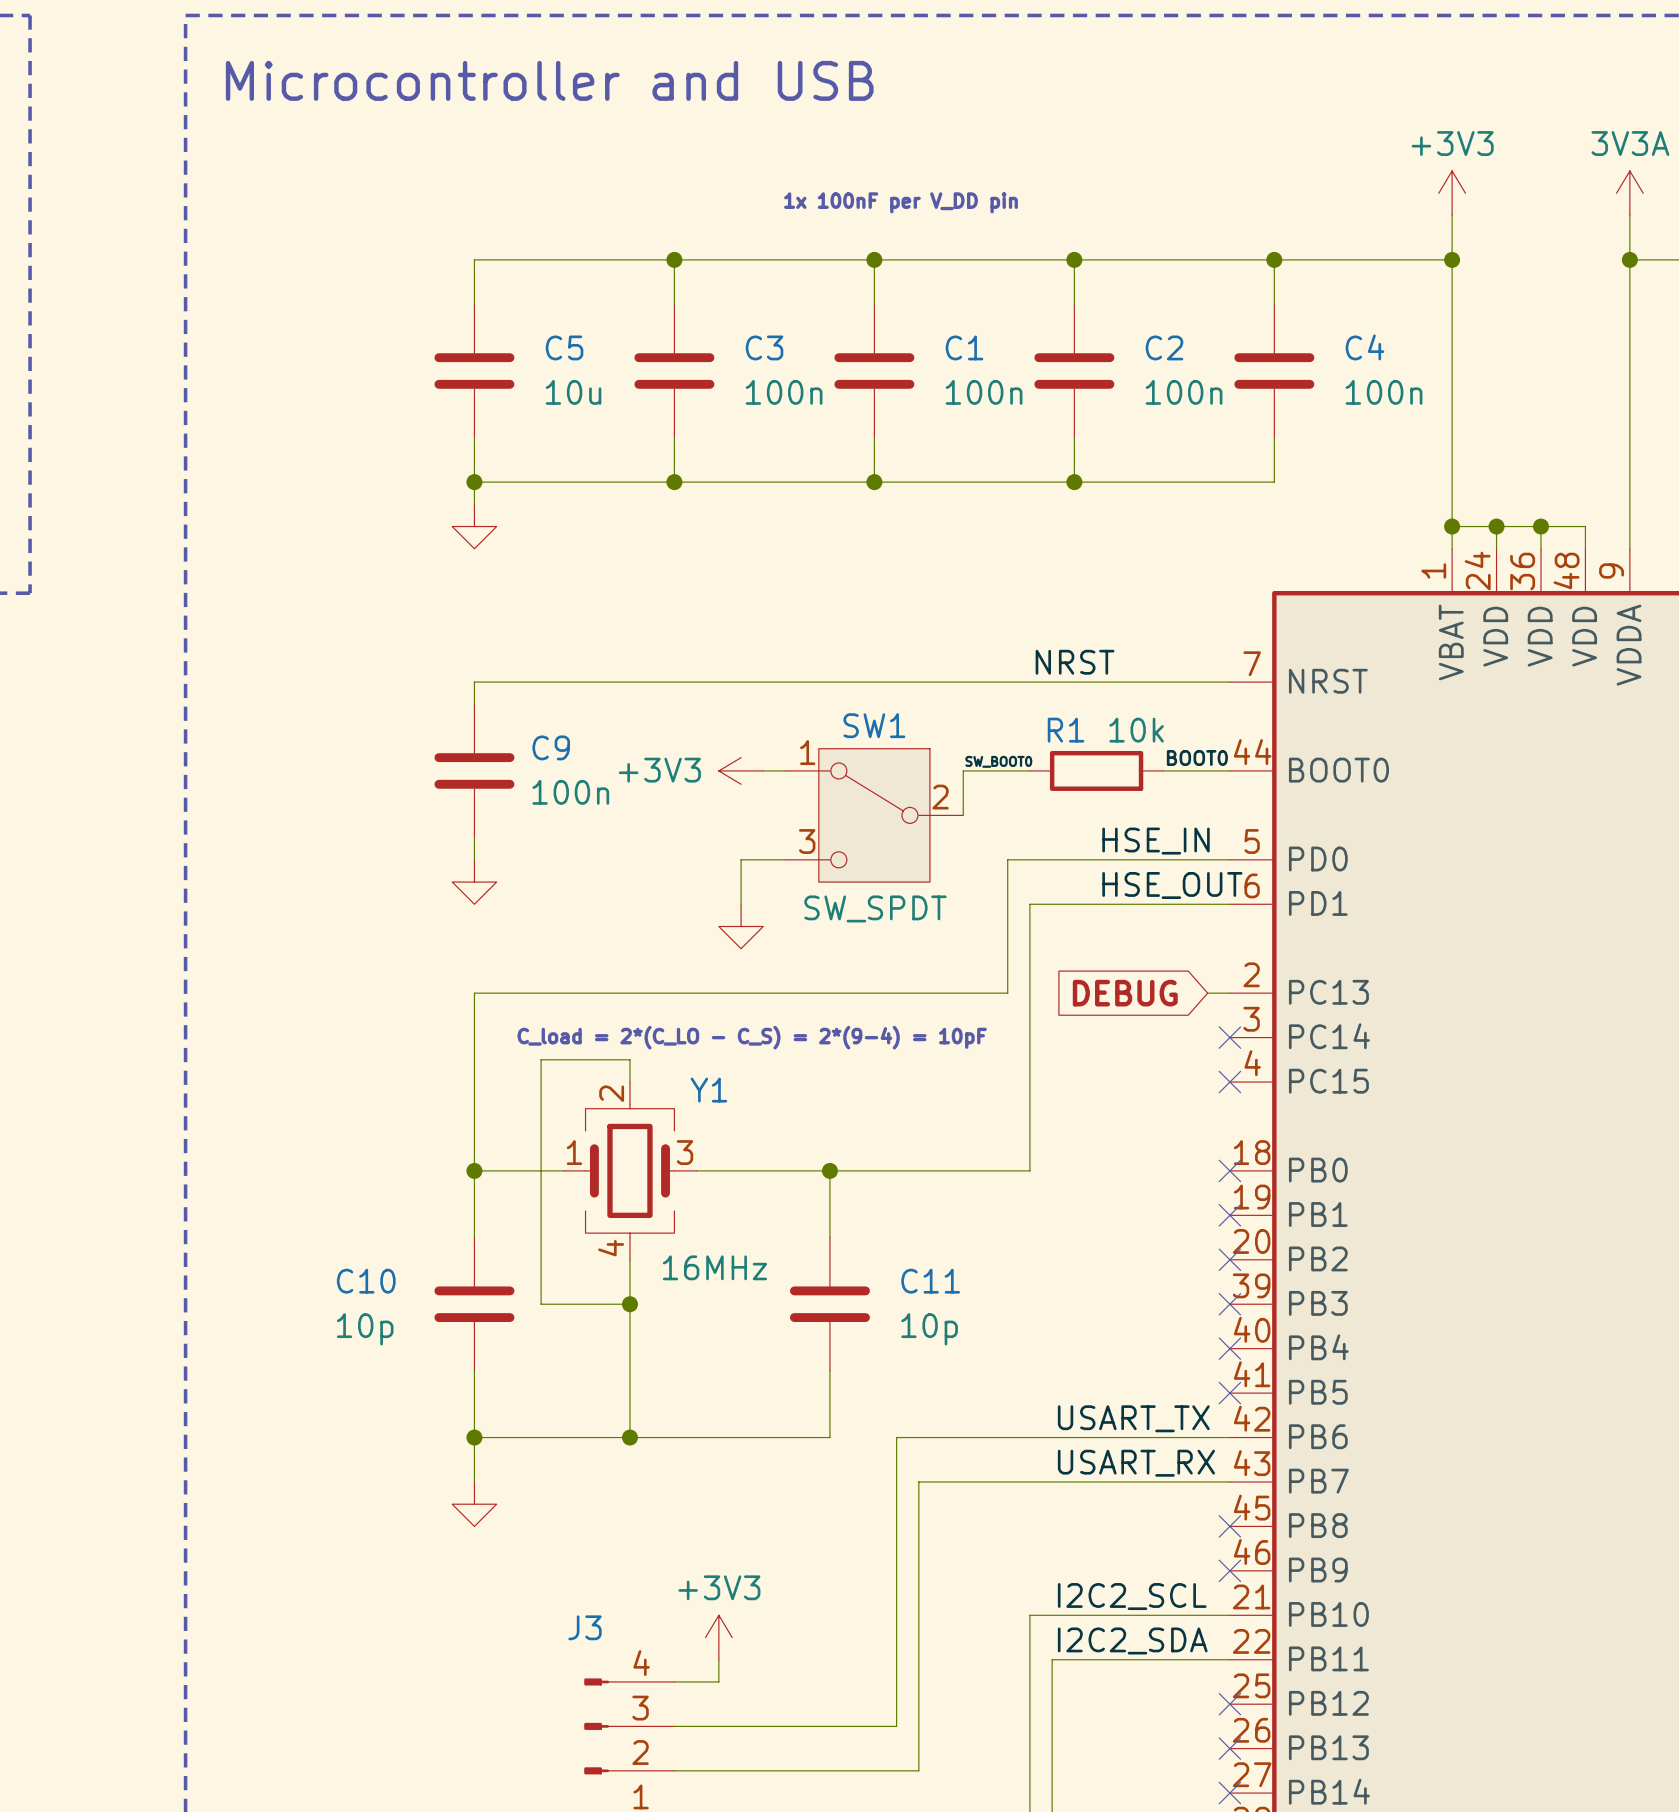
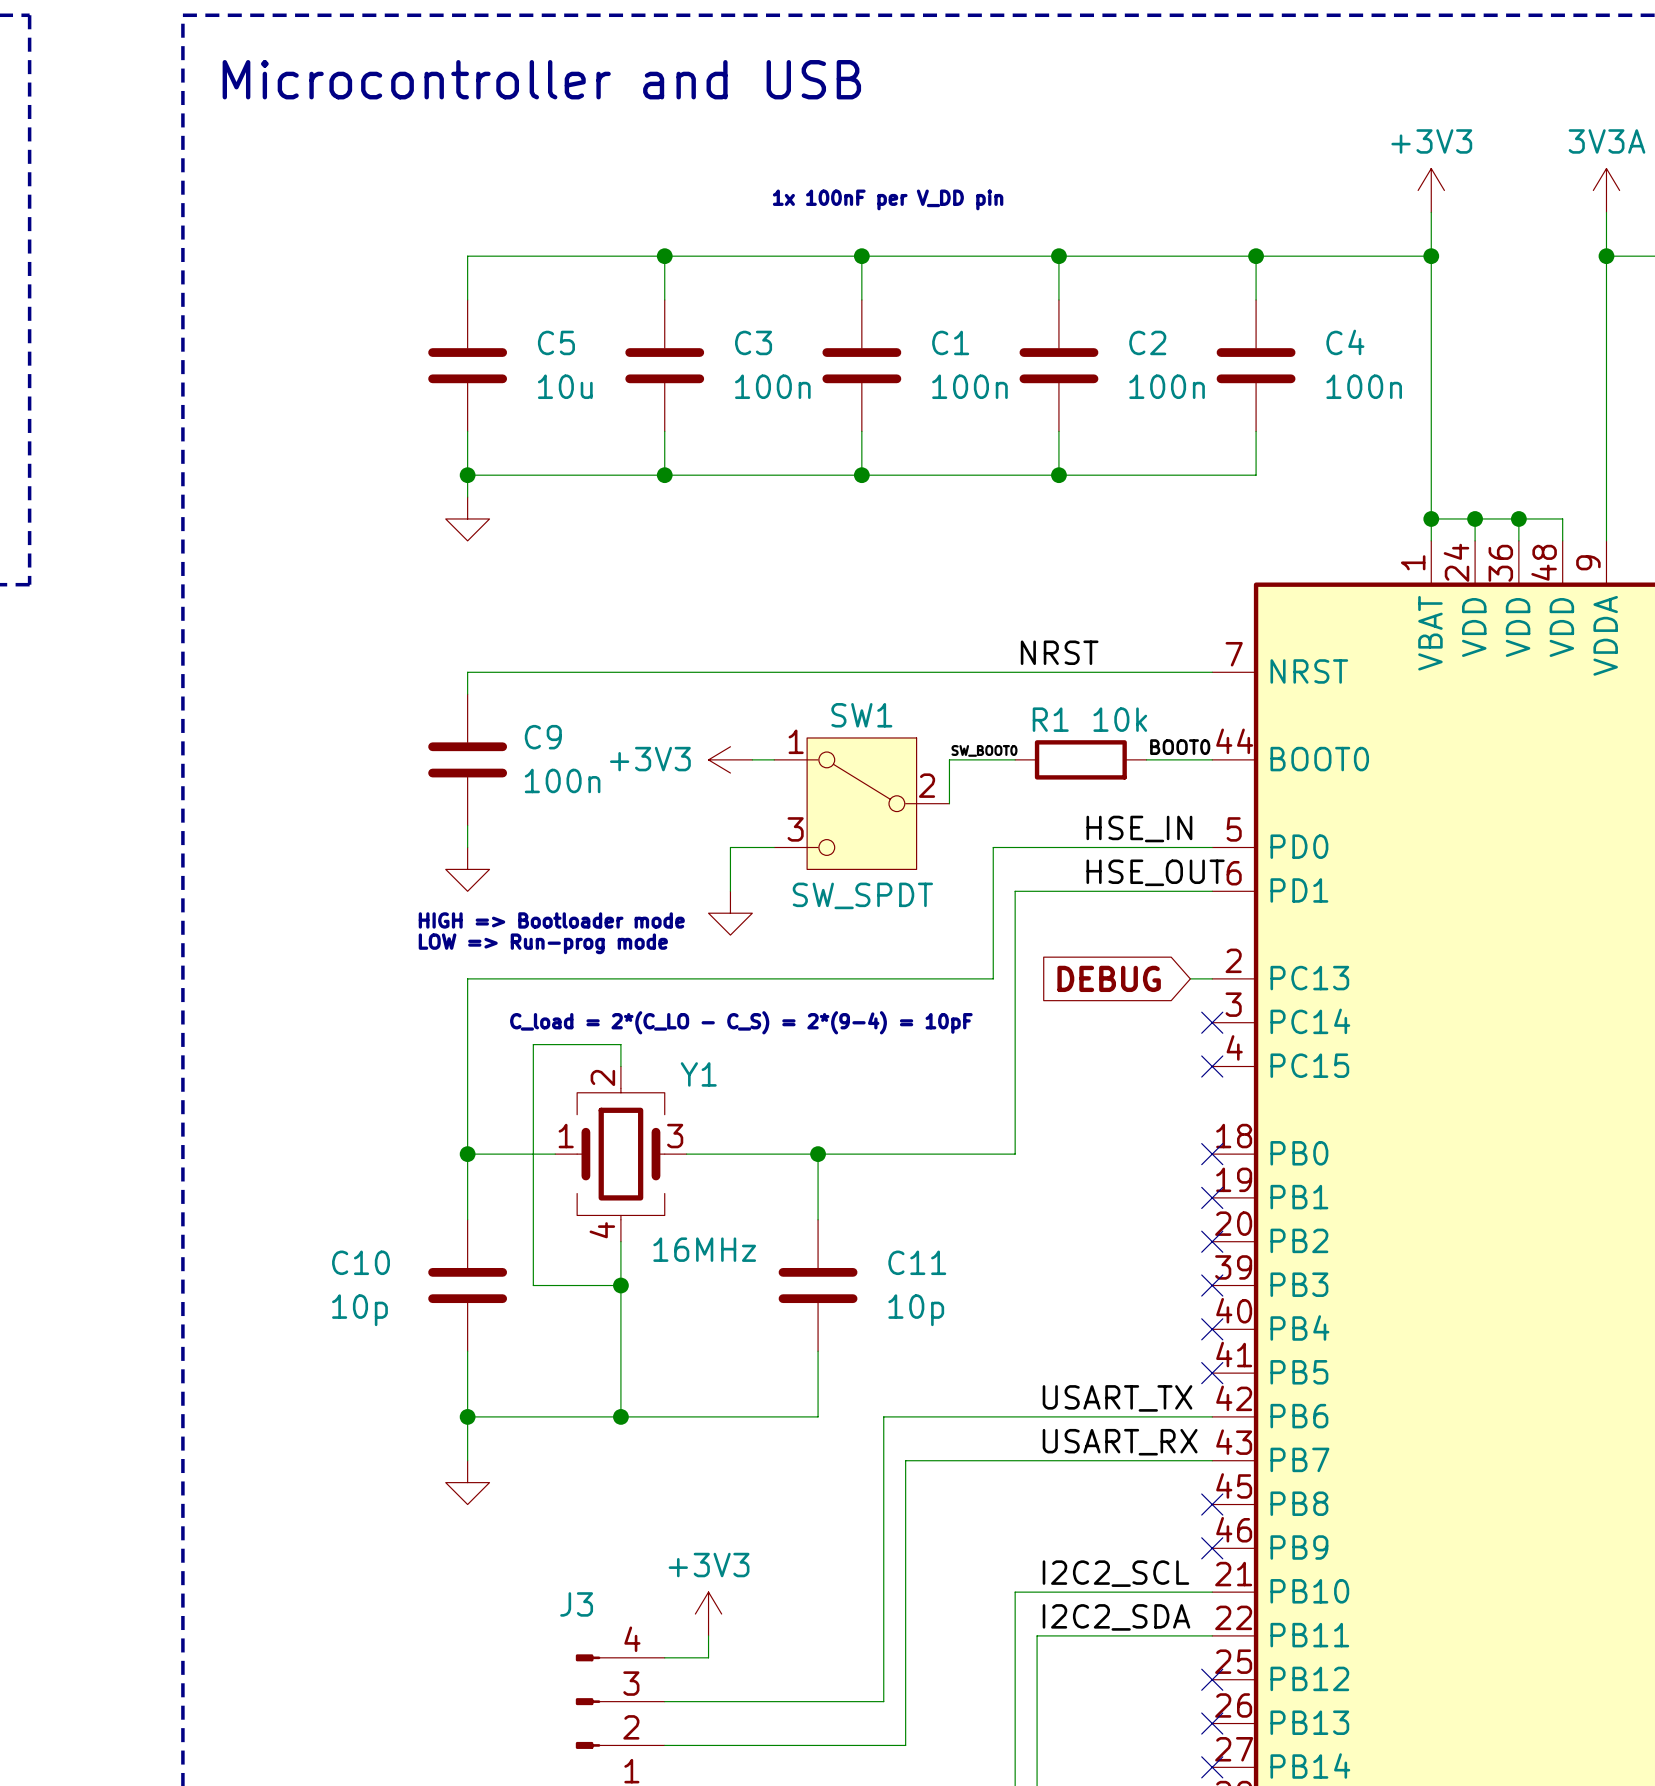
text: none -> HIGH => Bootloader mode (551, 920)
text: none -> LOW => Run-prog mode (543, 943)

